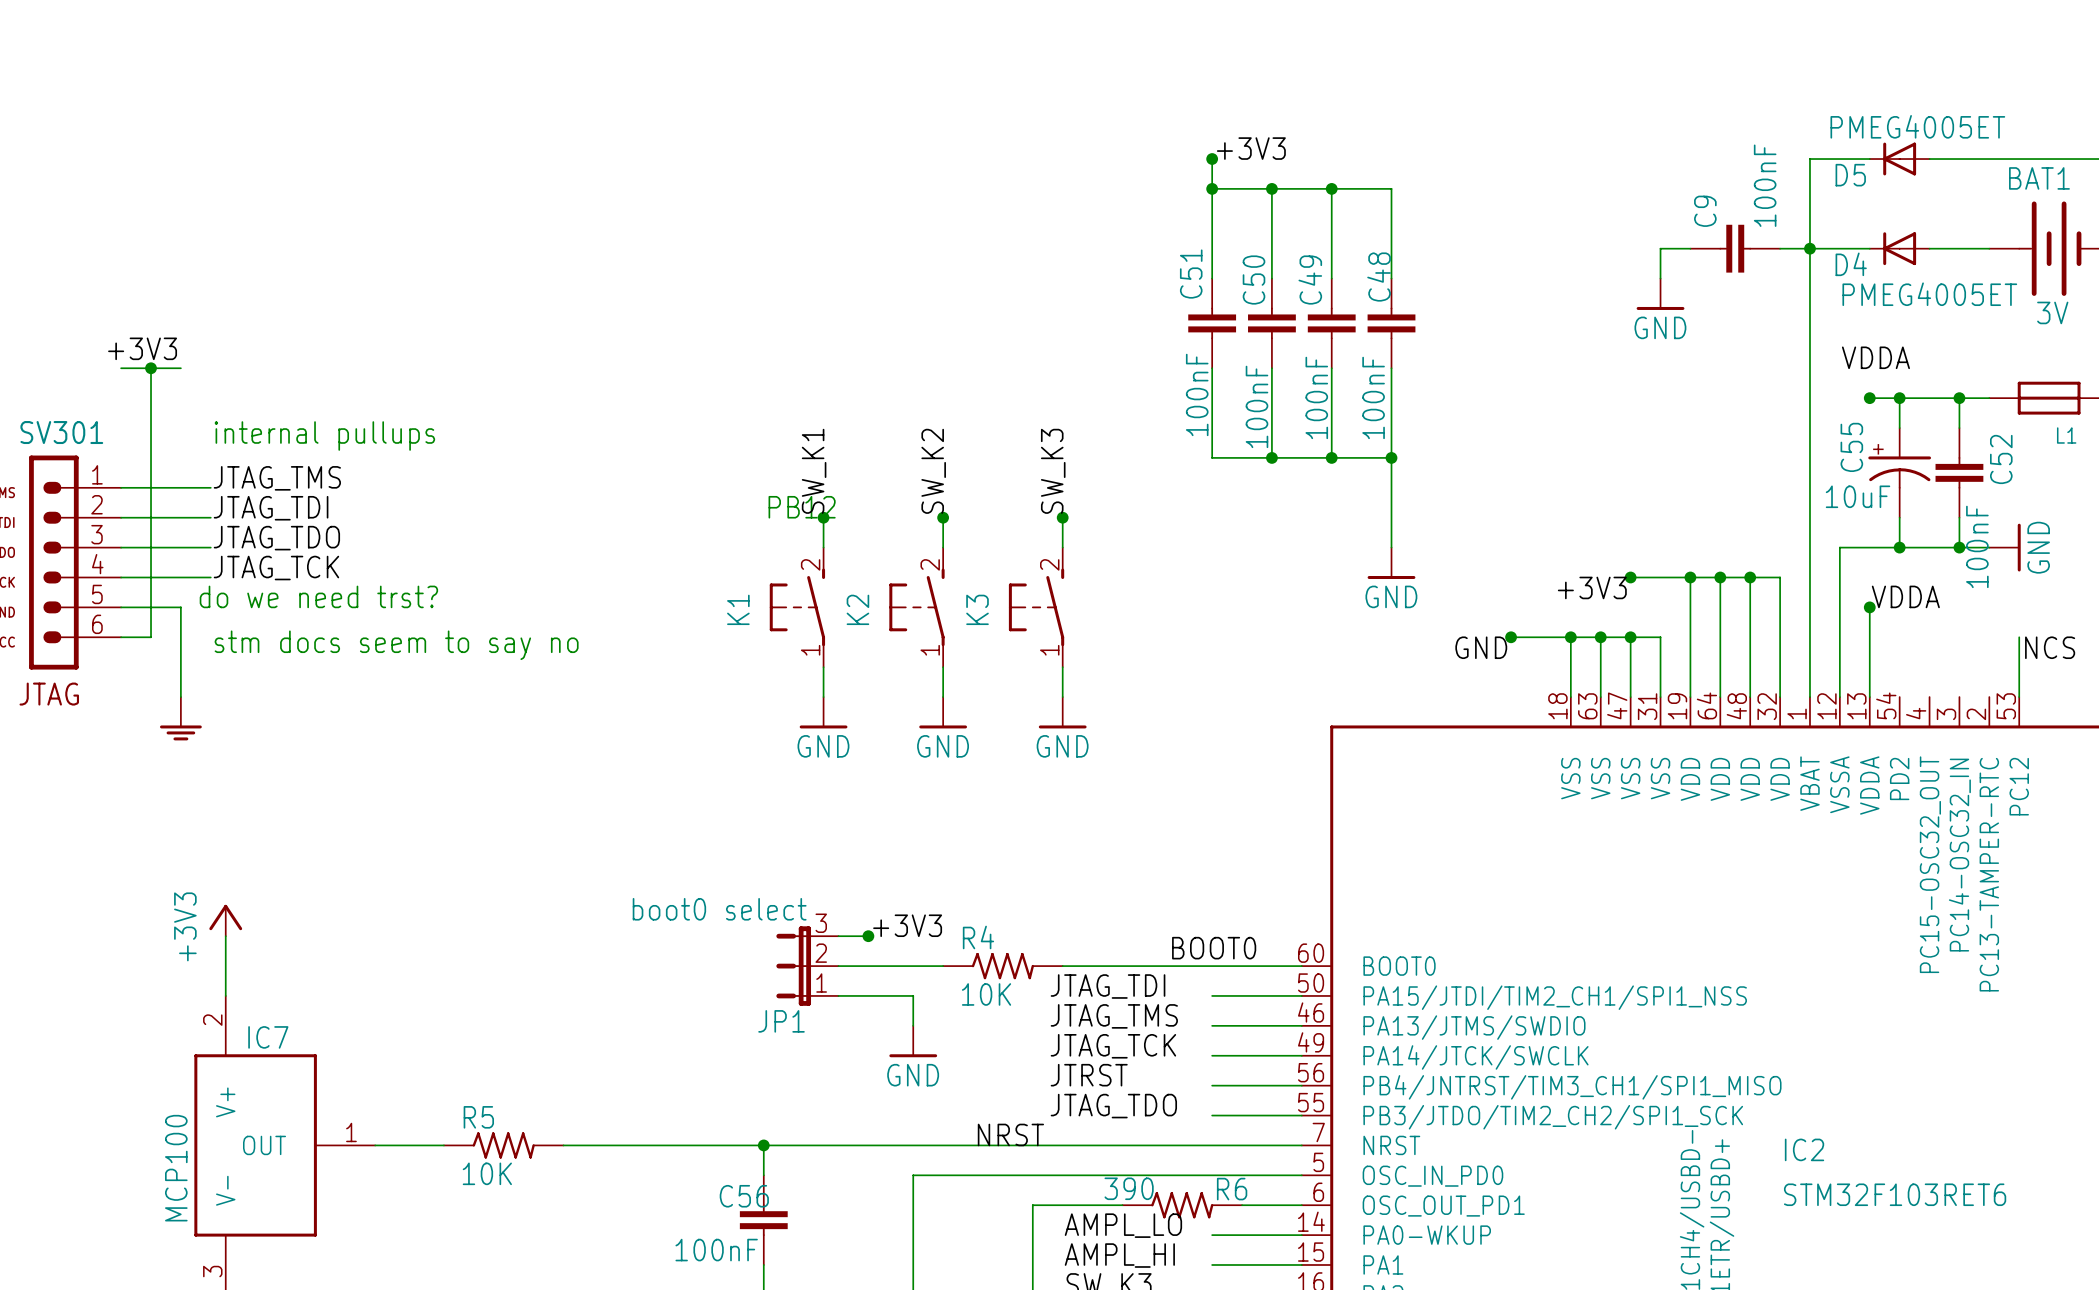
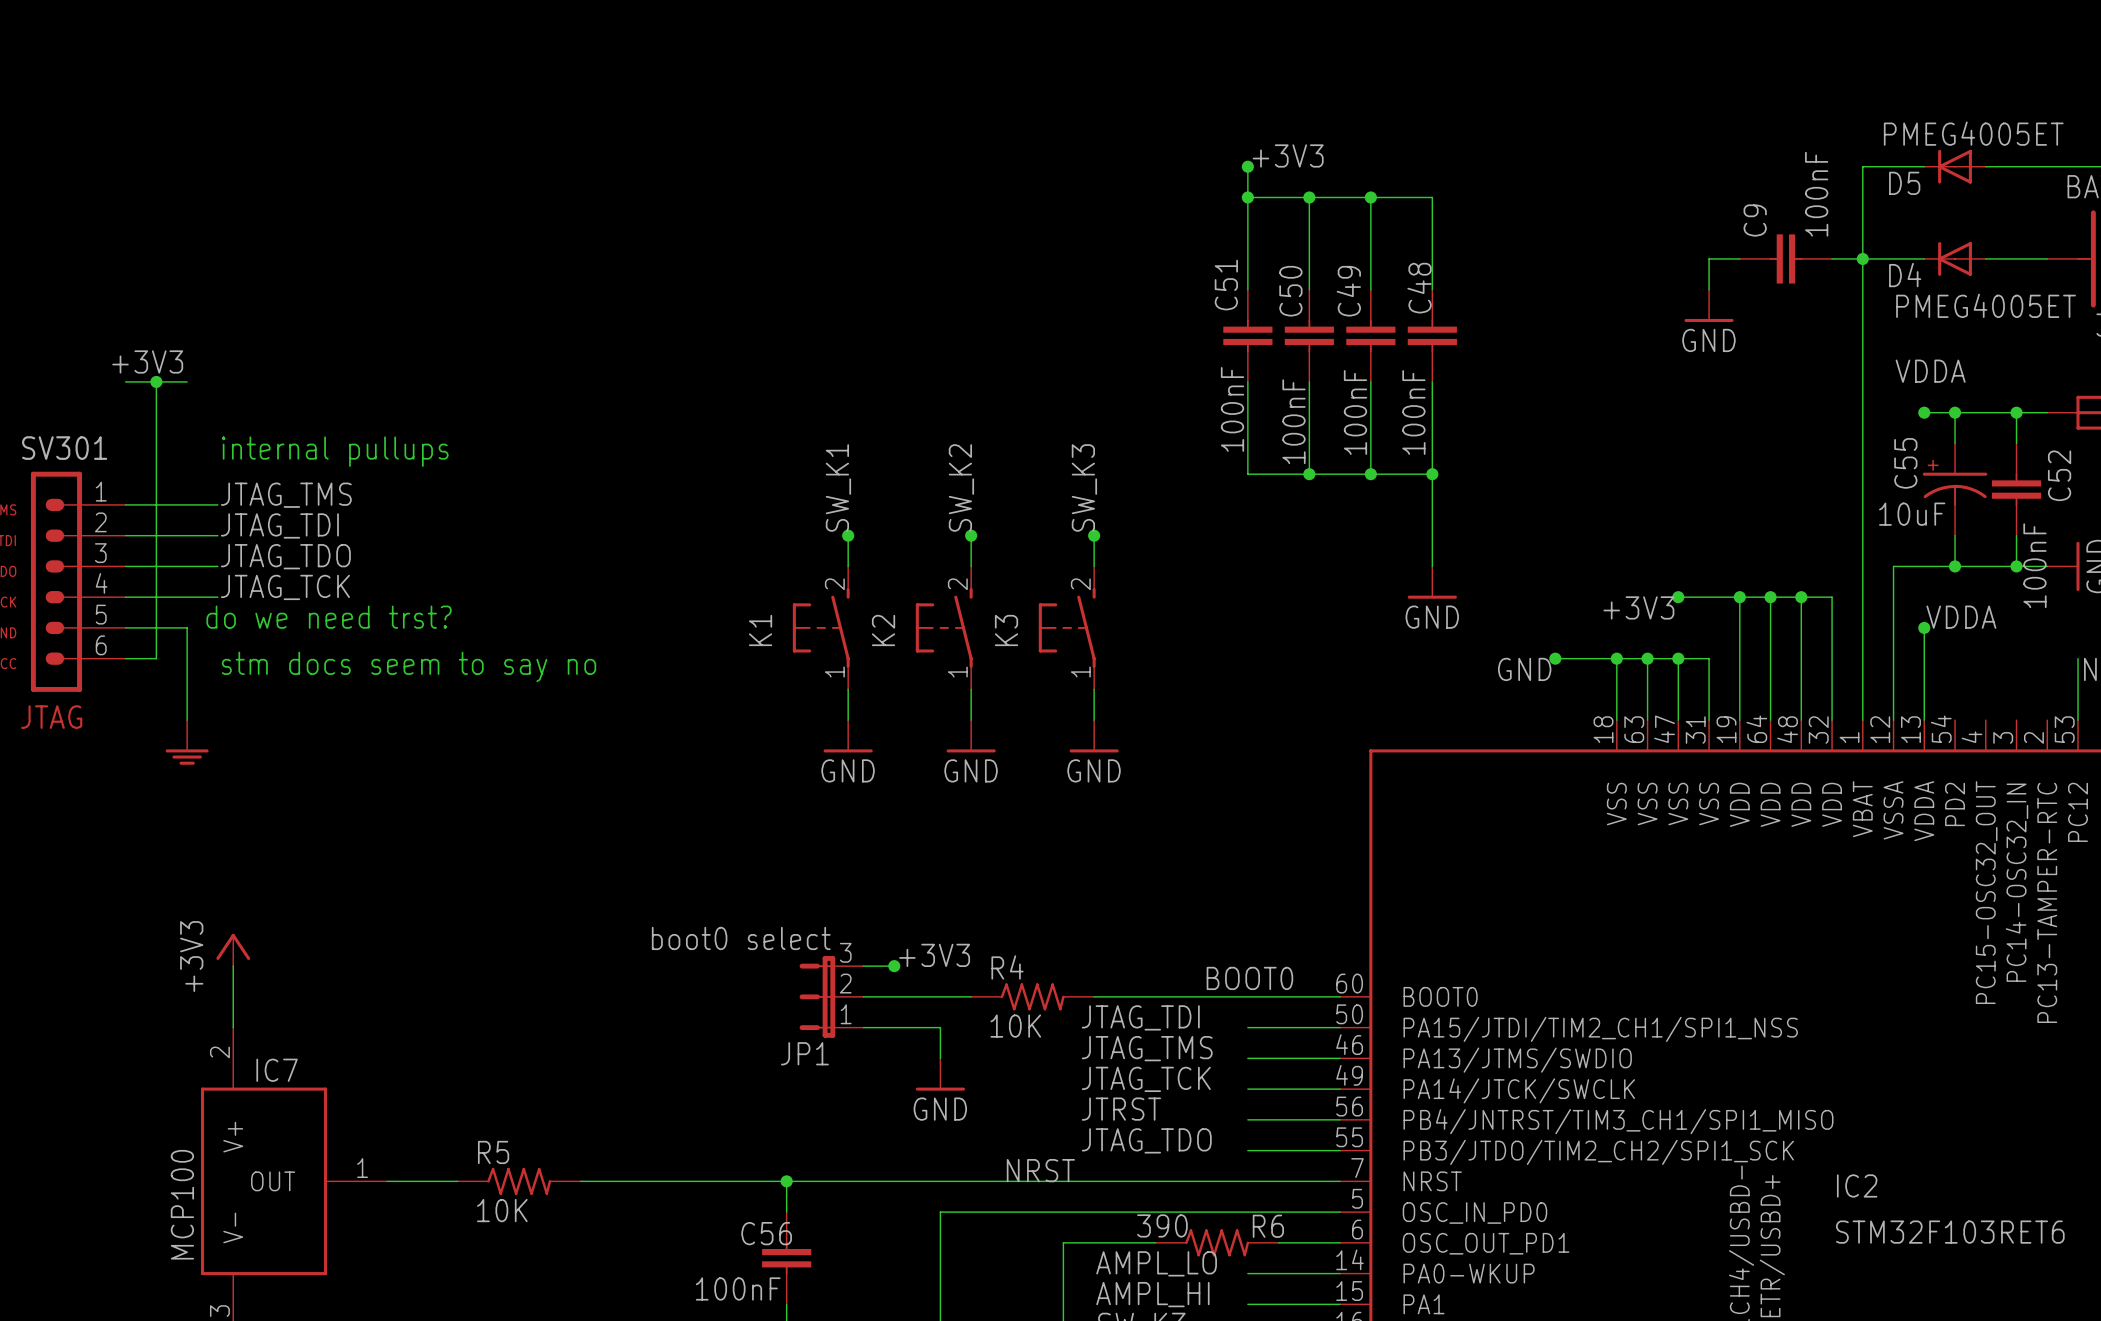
text: PB12 (802, 507) -> none

